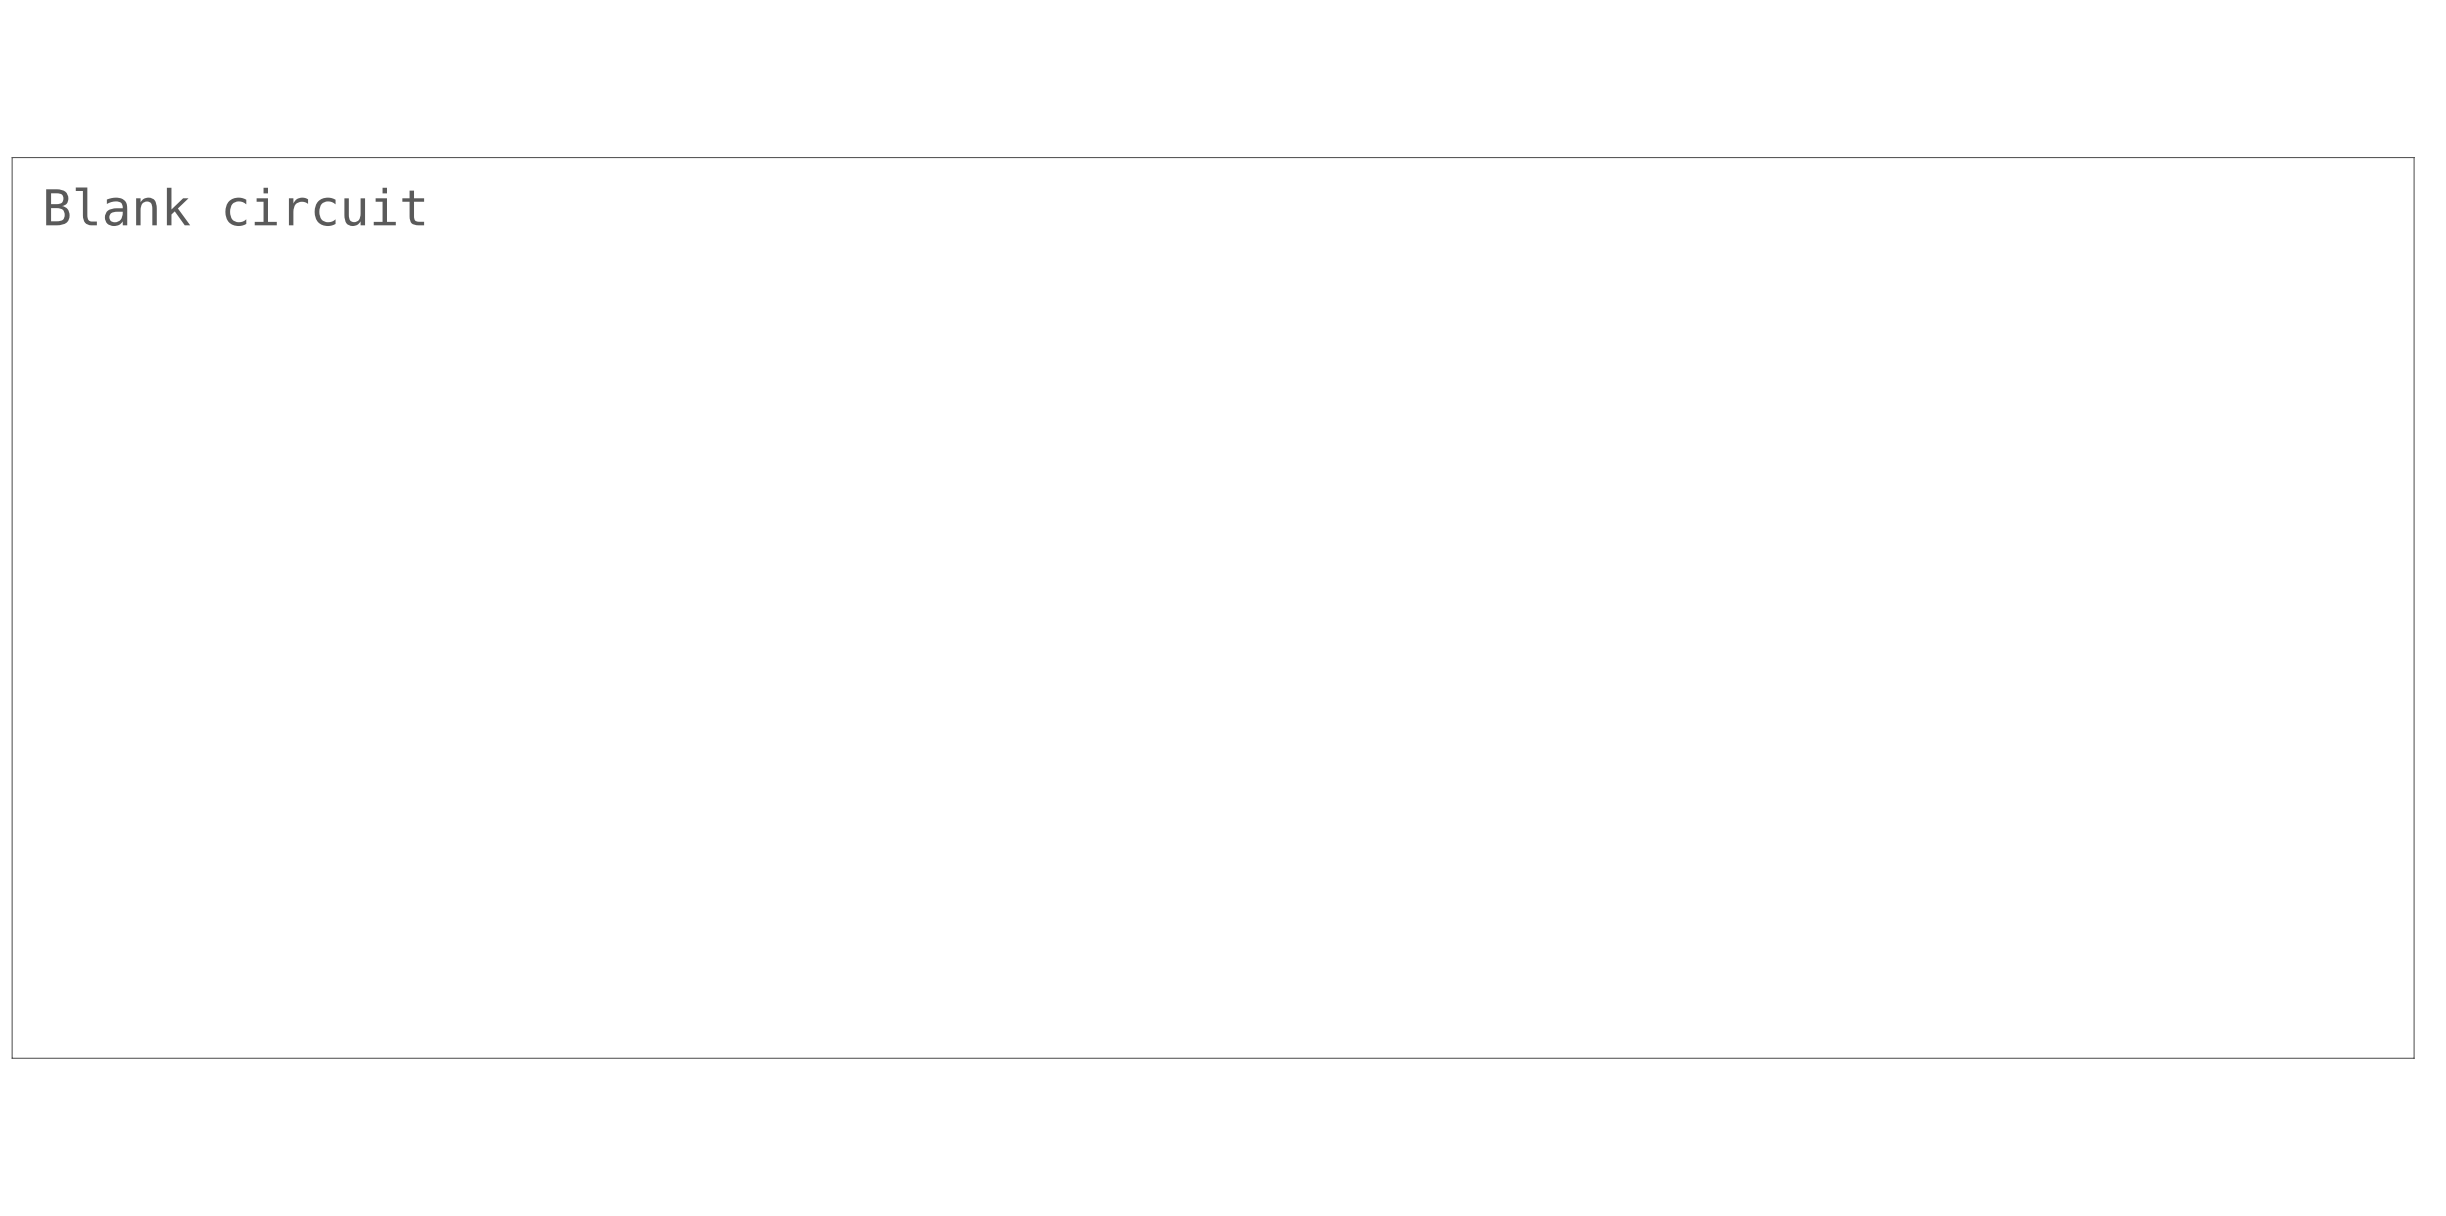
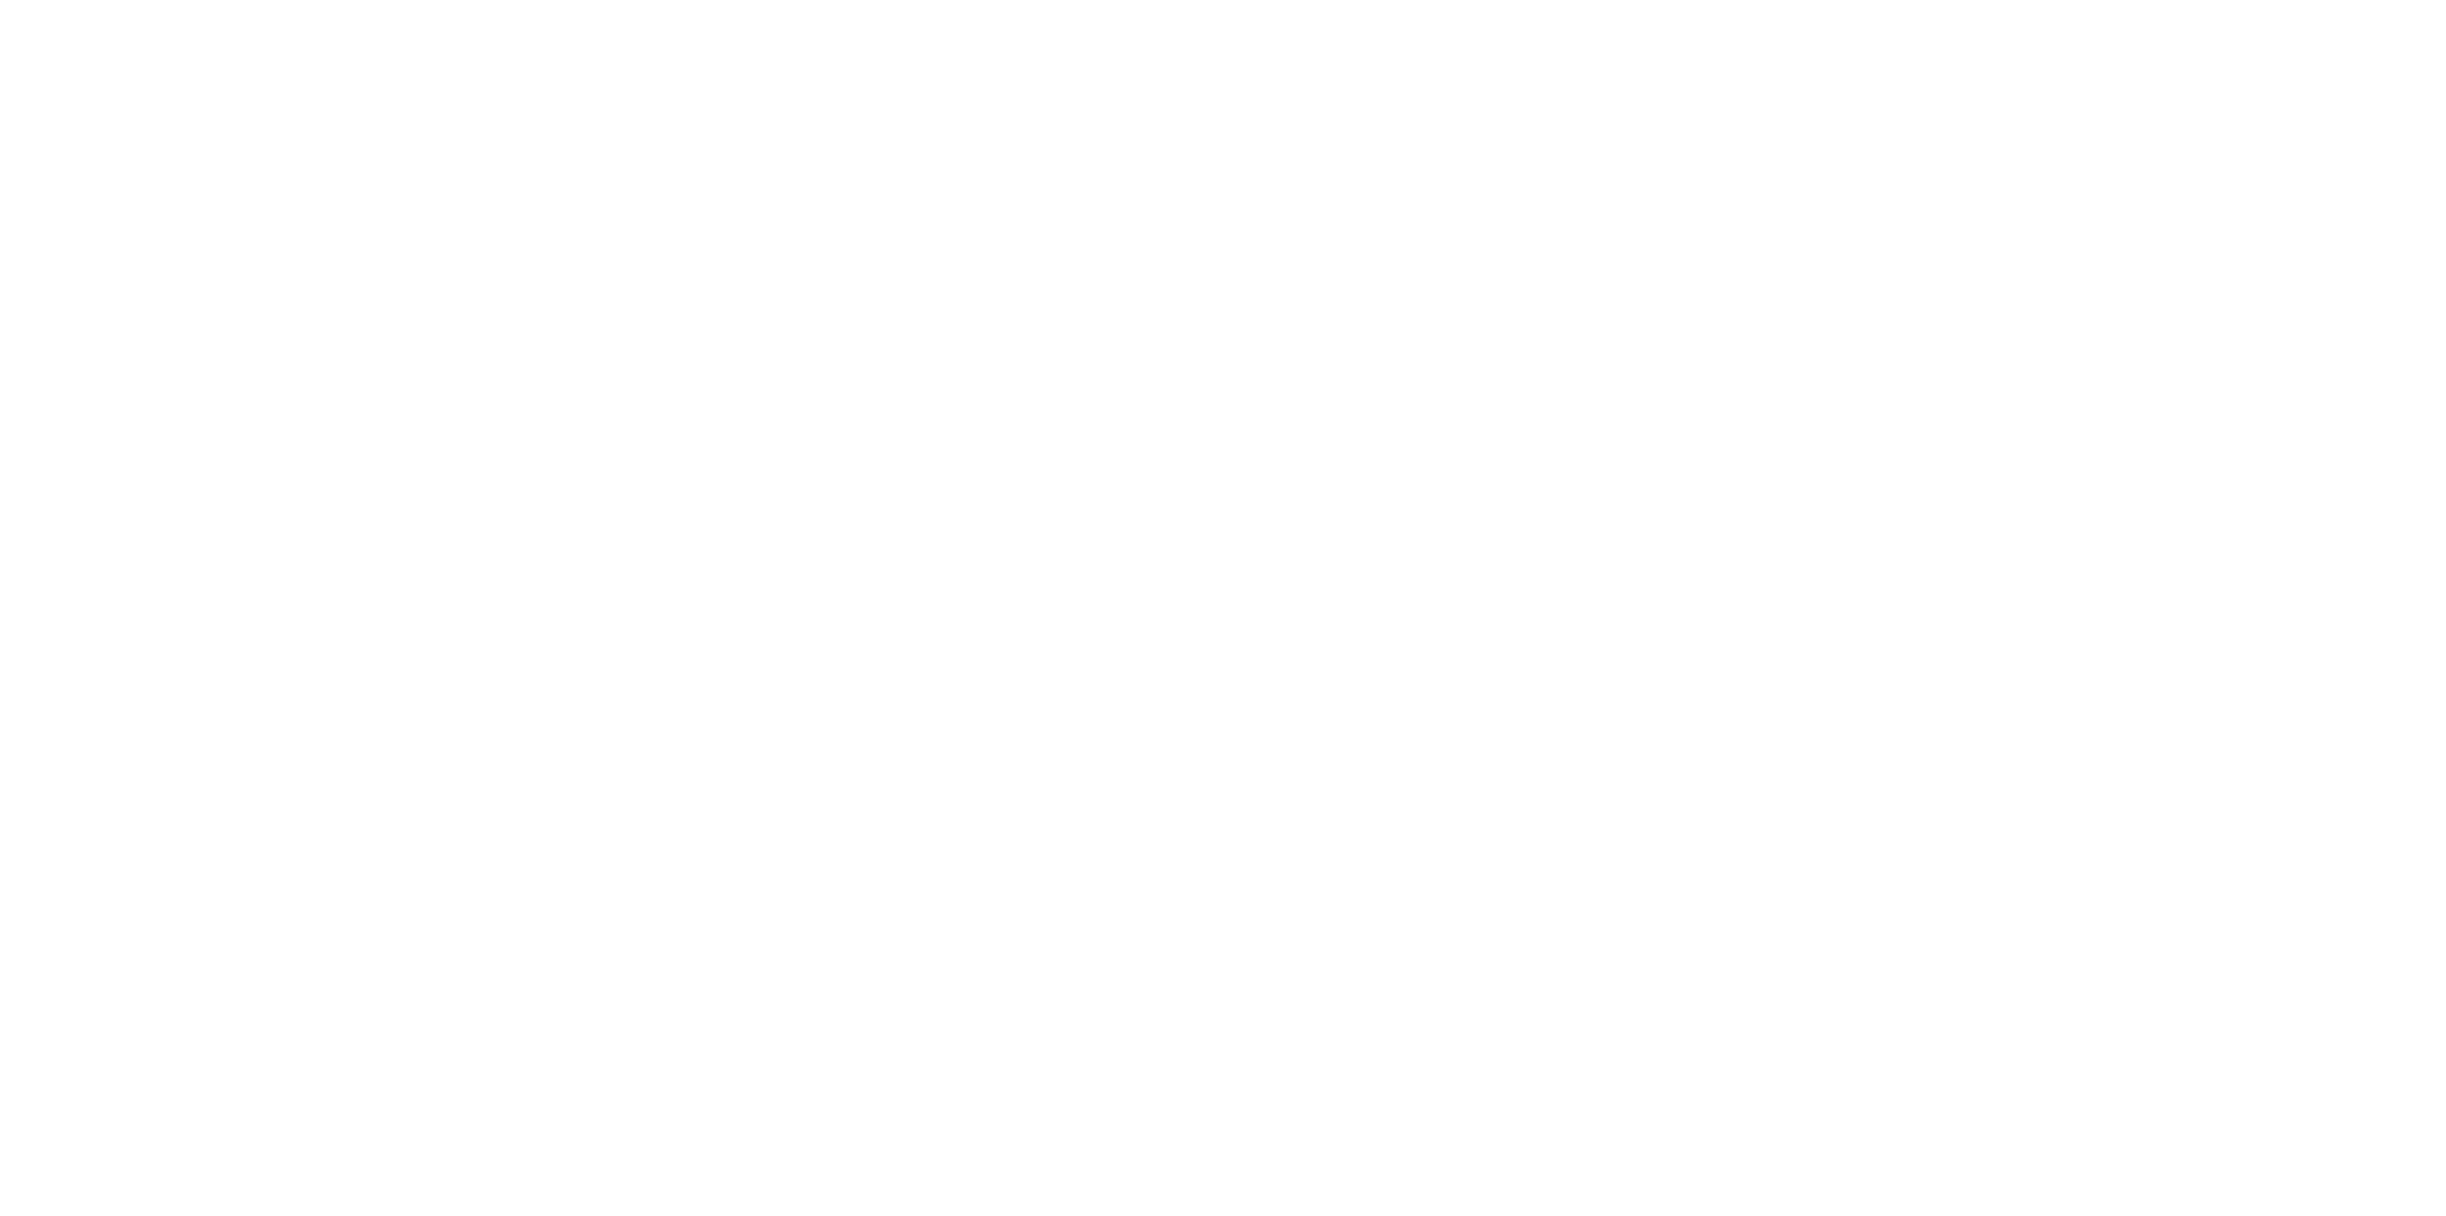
line: (12, 157) (2414, 157) (2414, 1058) (12, 1058) (12, 157) -> none
text: Blank circuit (235, 206) -> none

